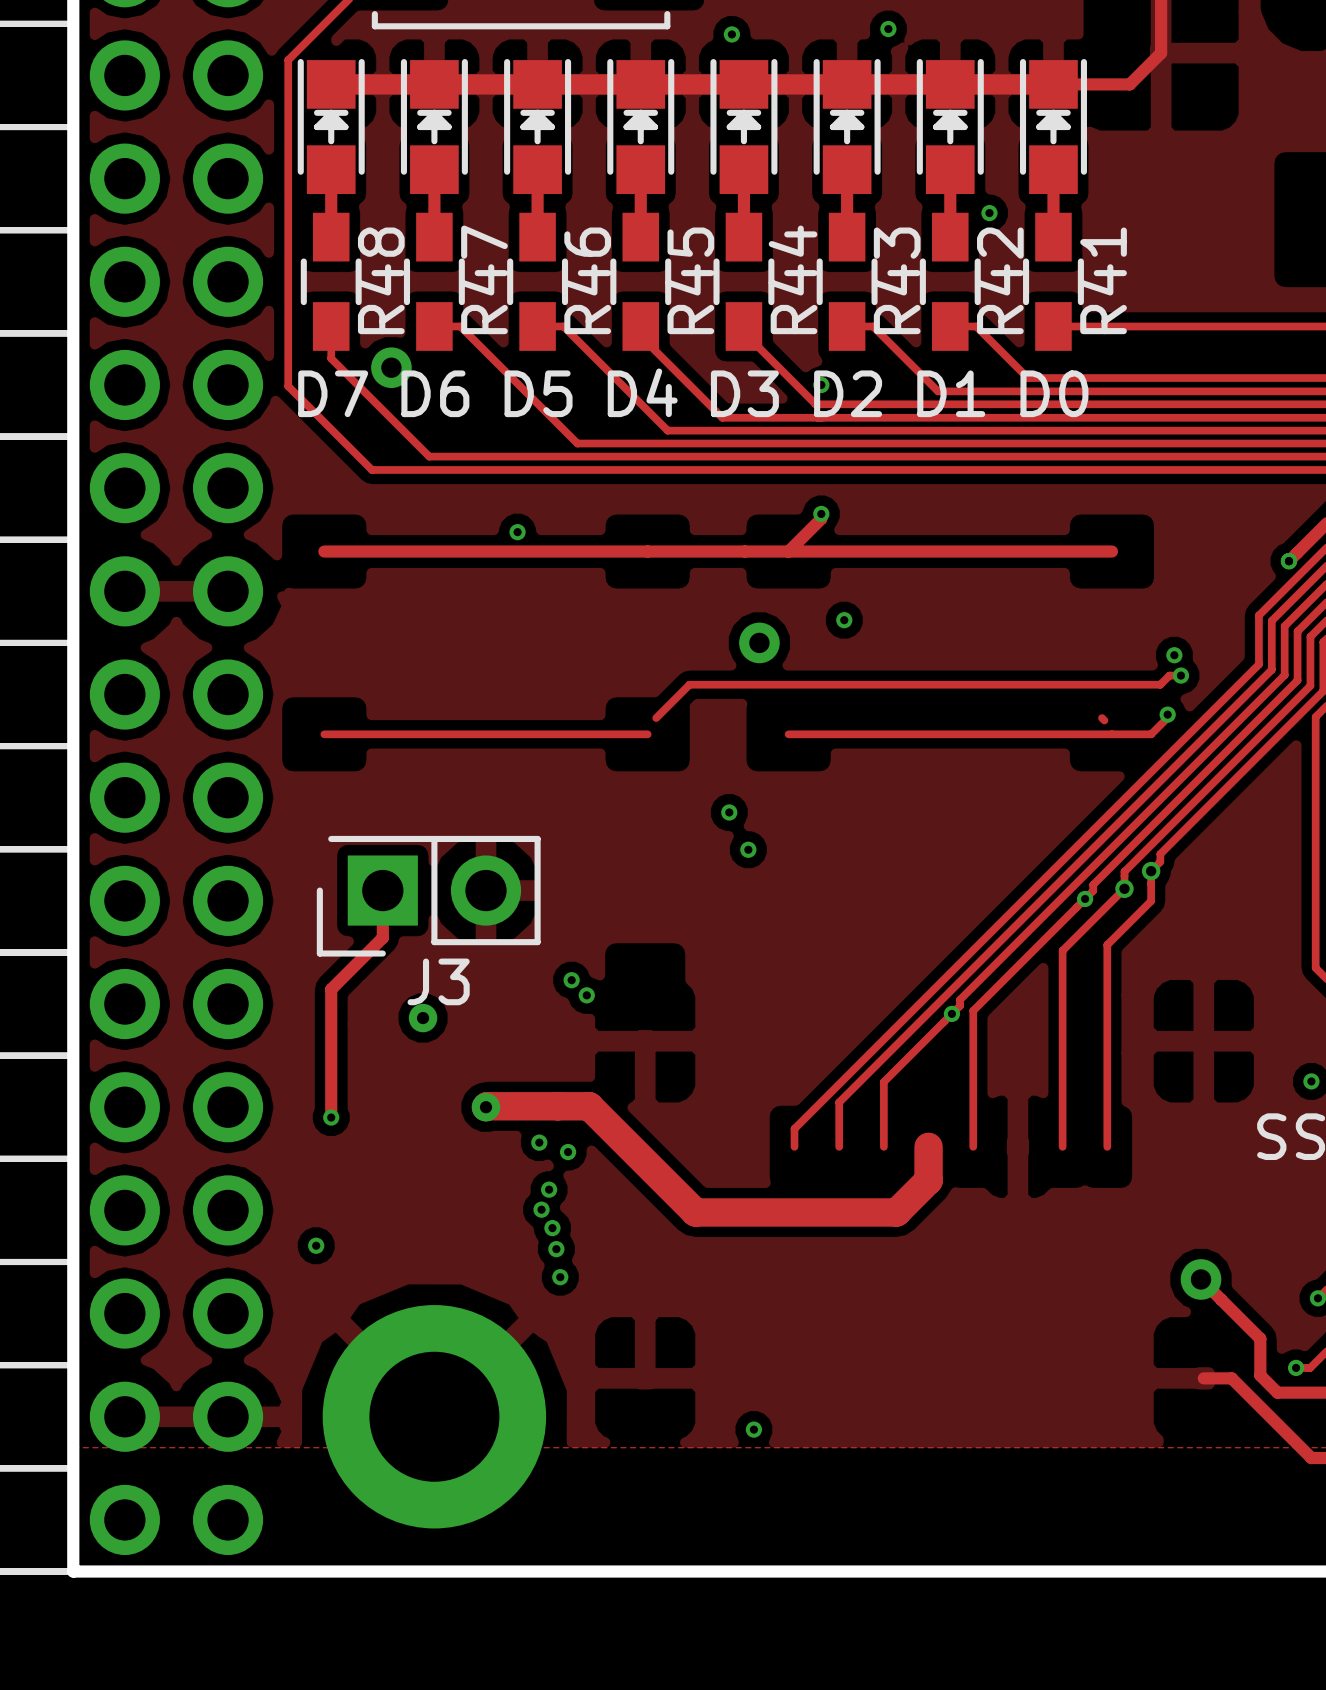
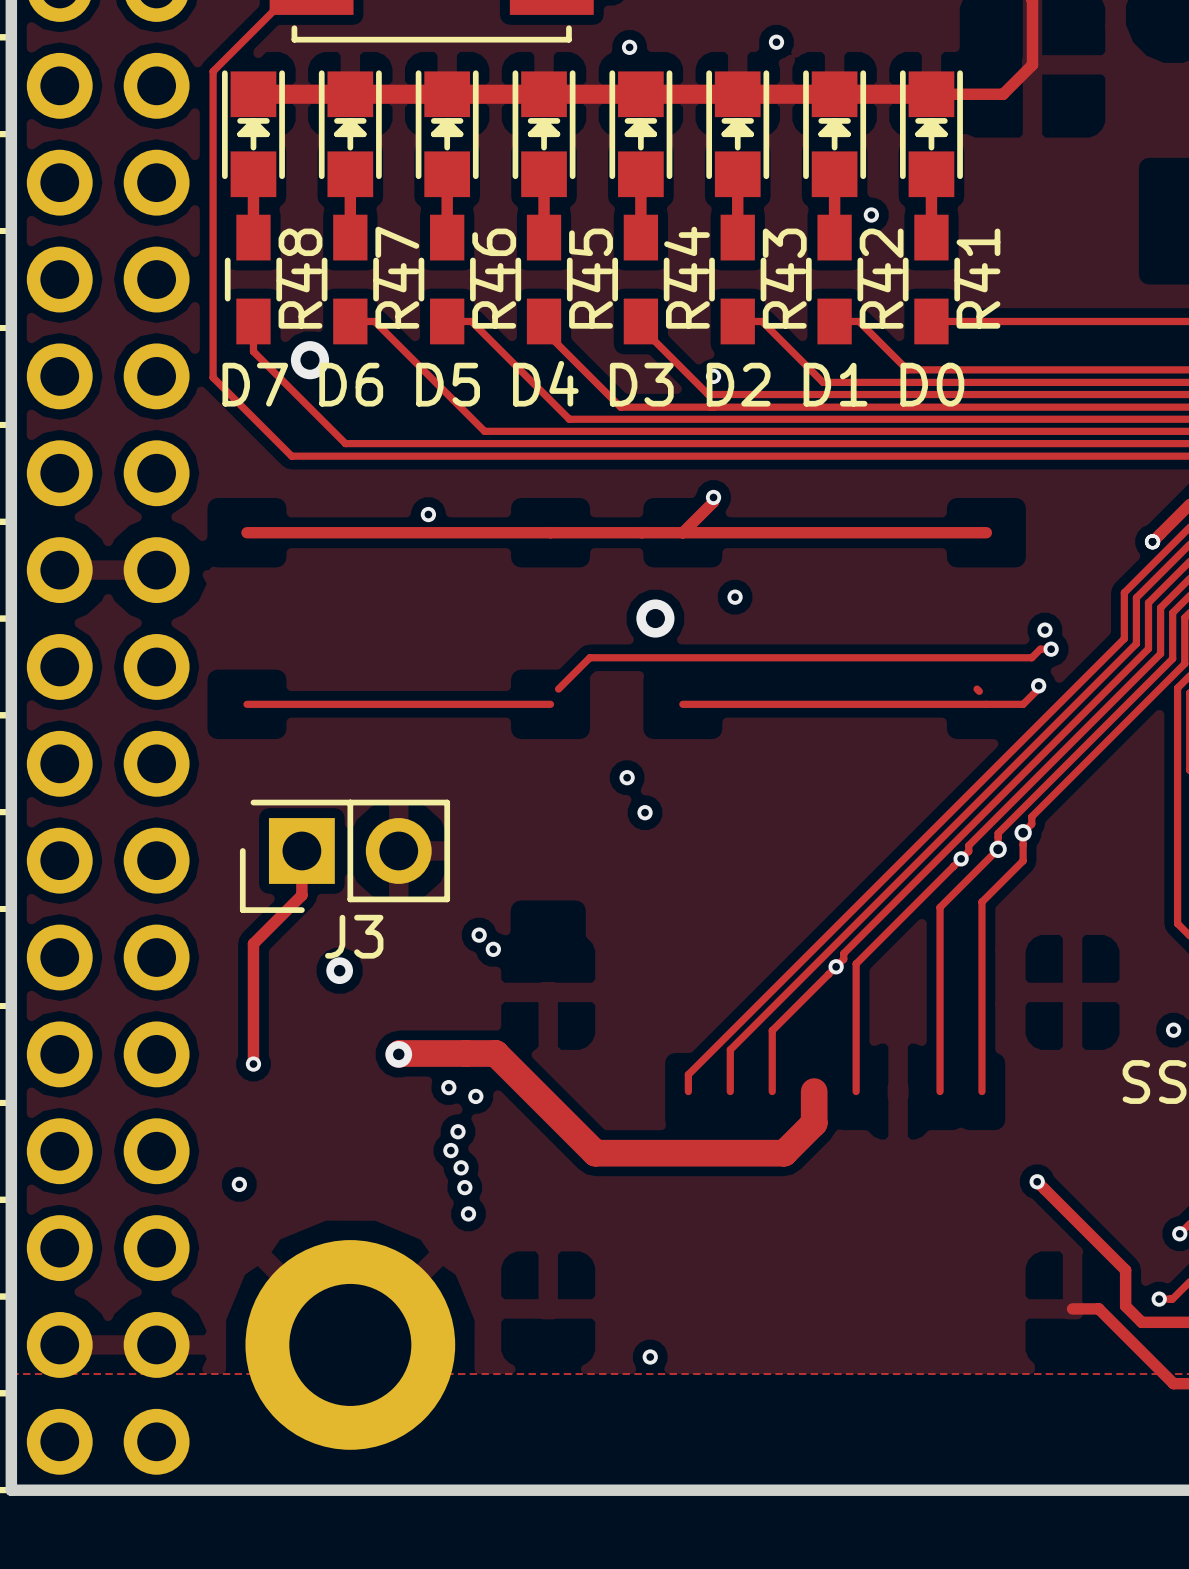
via: none -> (1037, 1181)
track: (1201, 1279) (1260, 1338) -> (1037, 1181) (1125, 1271)
via: (1201, 1279) -> none

